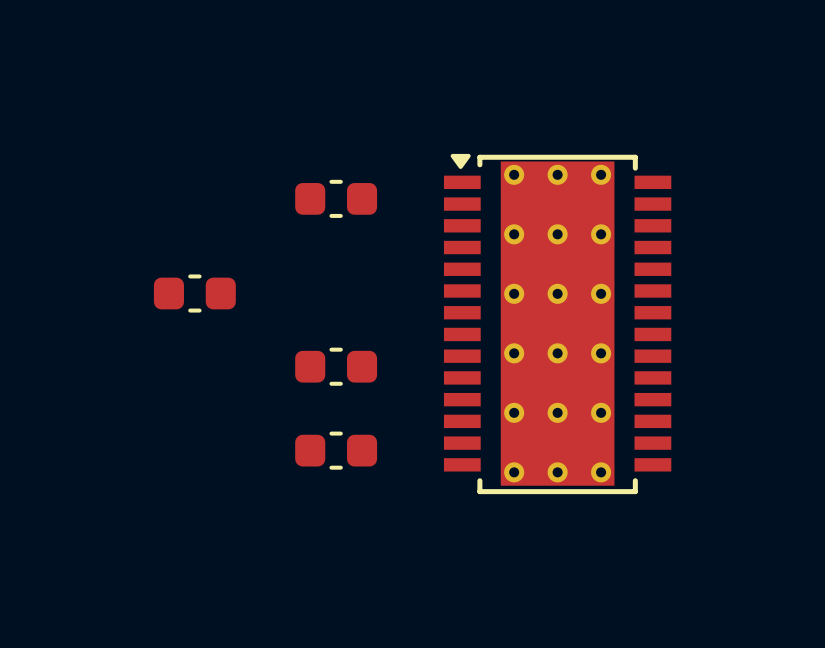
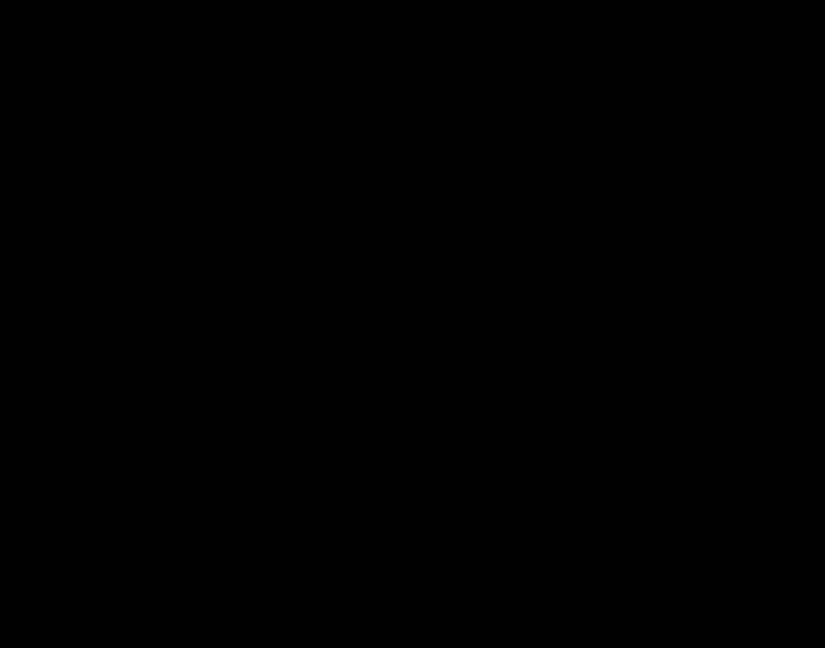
part: (336, 198) -> none
part: (194, 293) -> none
part: (557, 324) -> none
part: (336, 366) -> none
part: (336, 450) -> none

